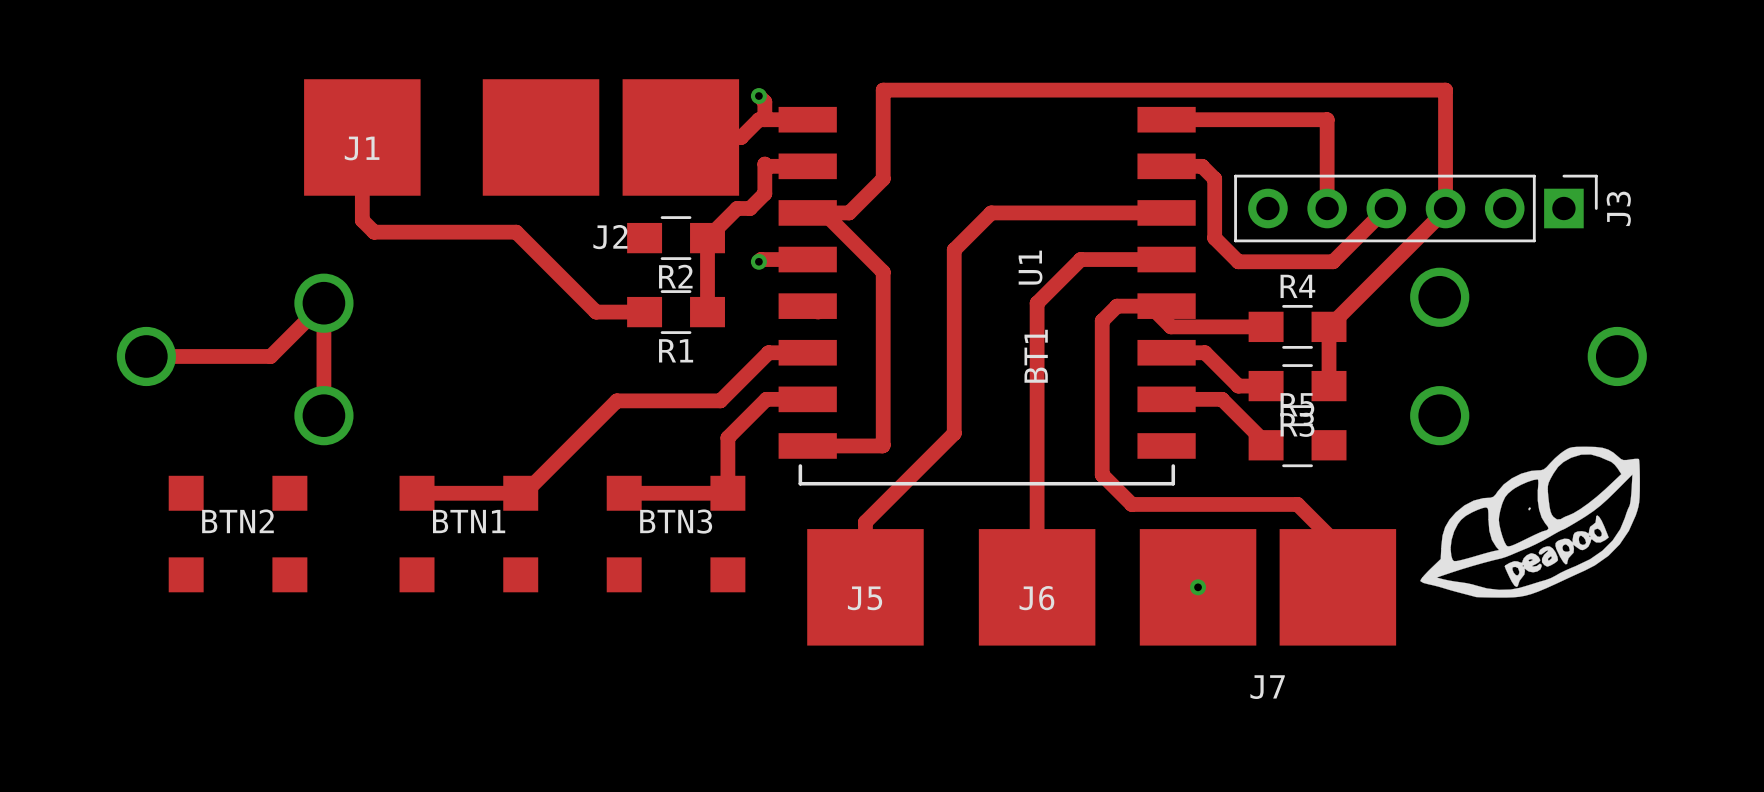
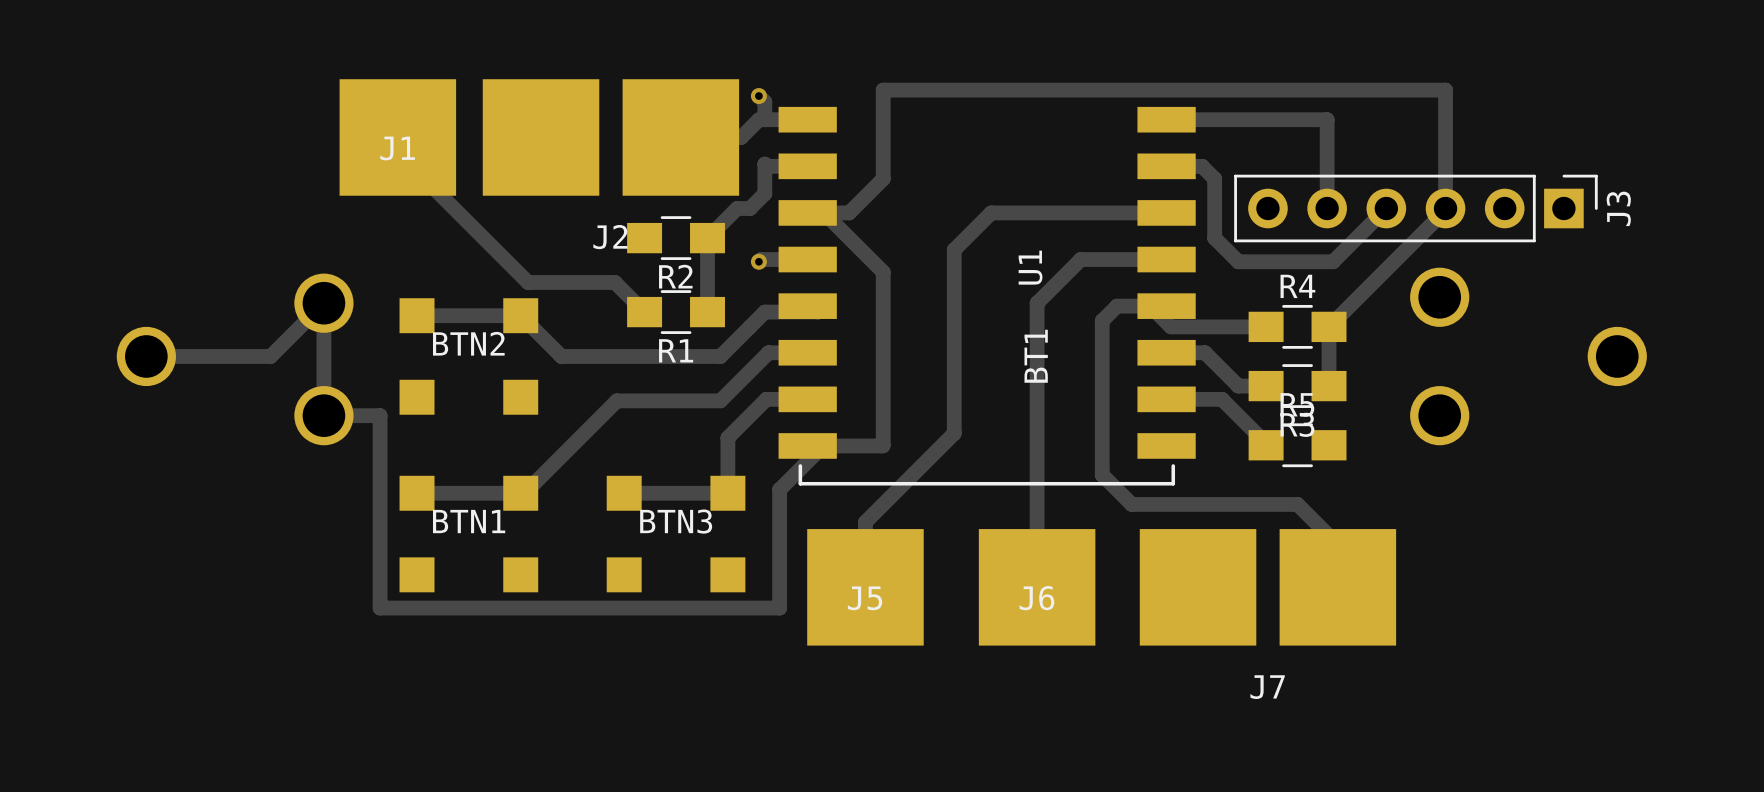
track: (362, 137) (362, 220) (374, 232) (516, 232) (596, 312) (644, 312) -> (397, 137) (397, 152) (528, 282) (614, 282) (644, 312)
J1 position: (362, 137) -> (397, 137)
track: none -> (818, 312) (764, 312) (720, 356) (561, 356) (520, 315) (417, 315)
track: none -> (323, 415) (380, 415) (380, 608) (779, 608) (779, 489) (823, 445)
drawing: [1420, 446, 1640, 598] -> none
BTN2 position: (238, 534) -> (468, 356)
via: (1198, 587) -> none

